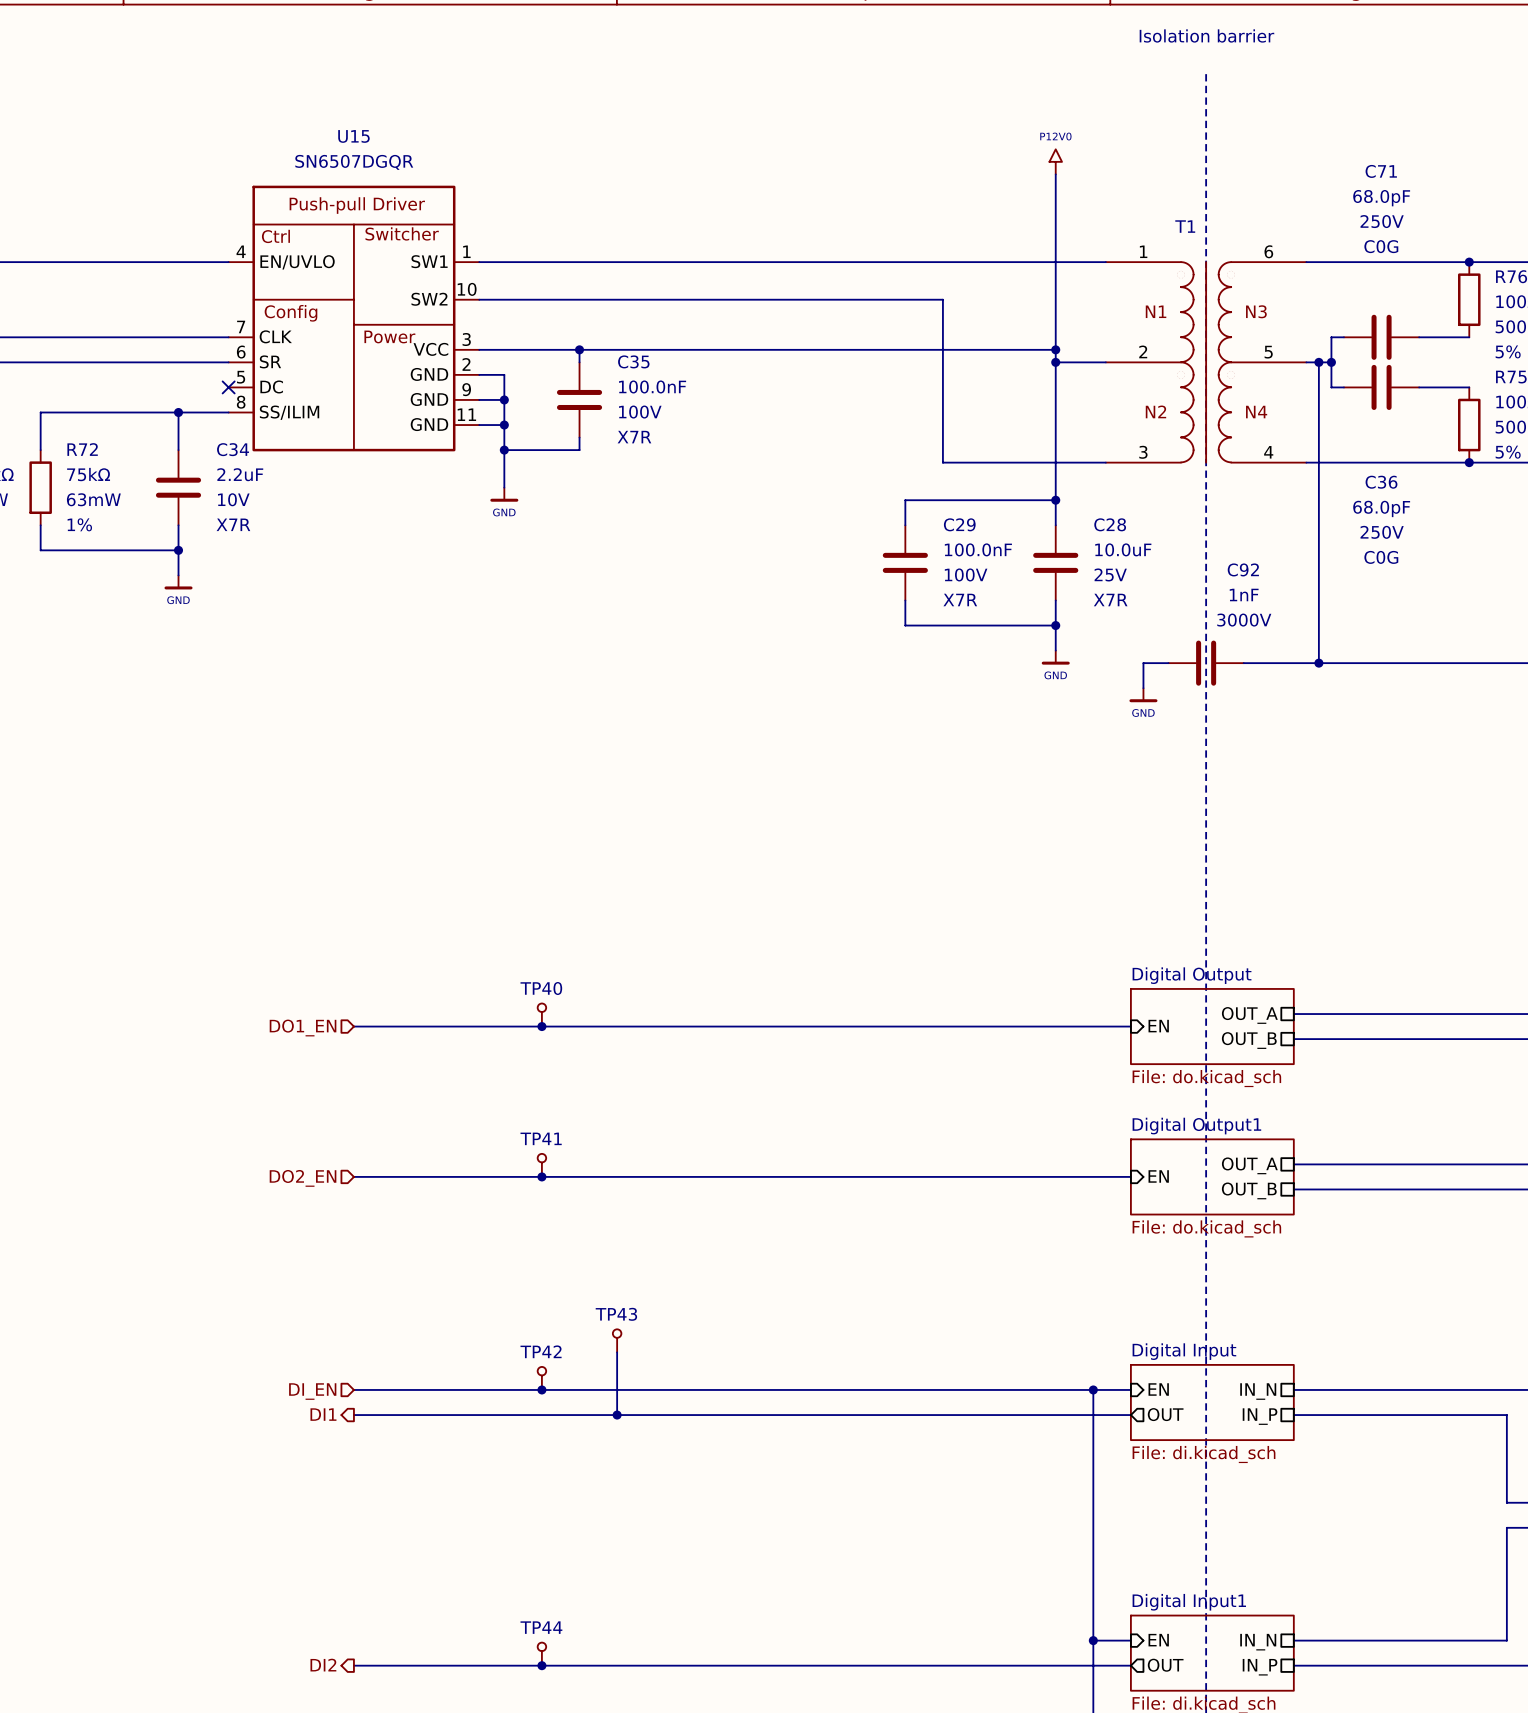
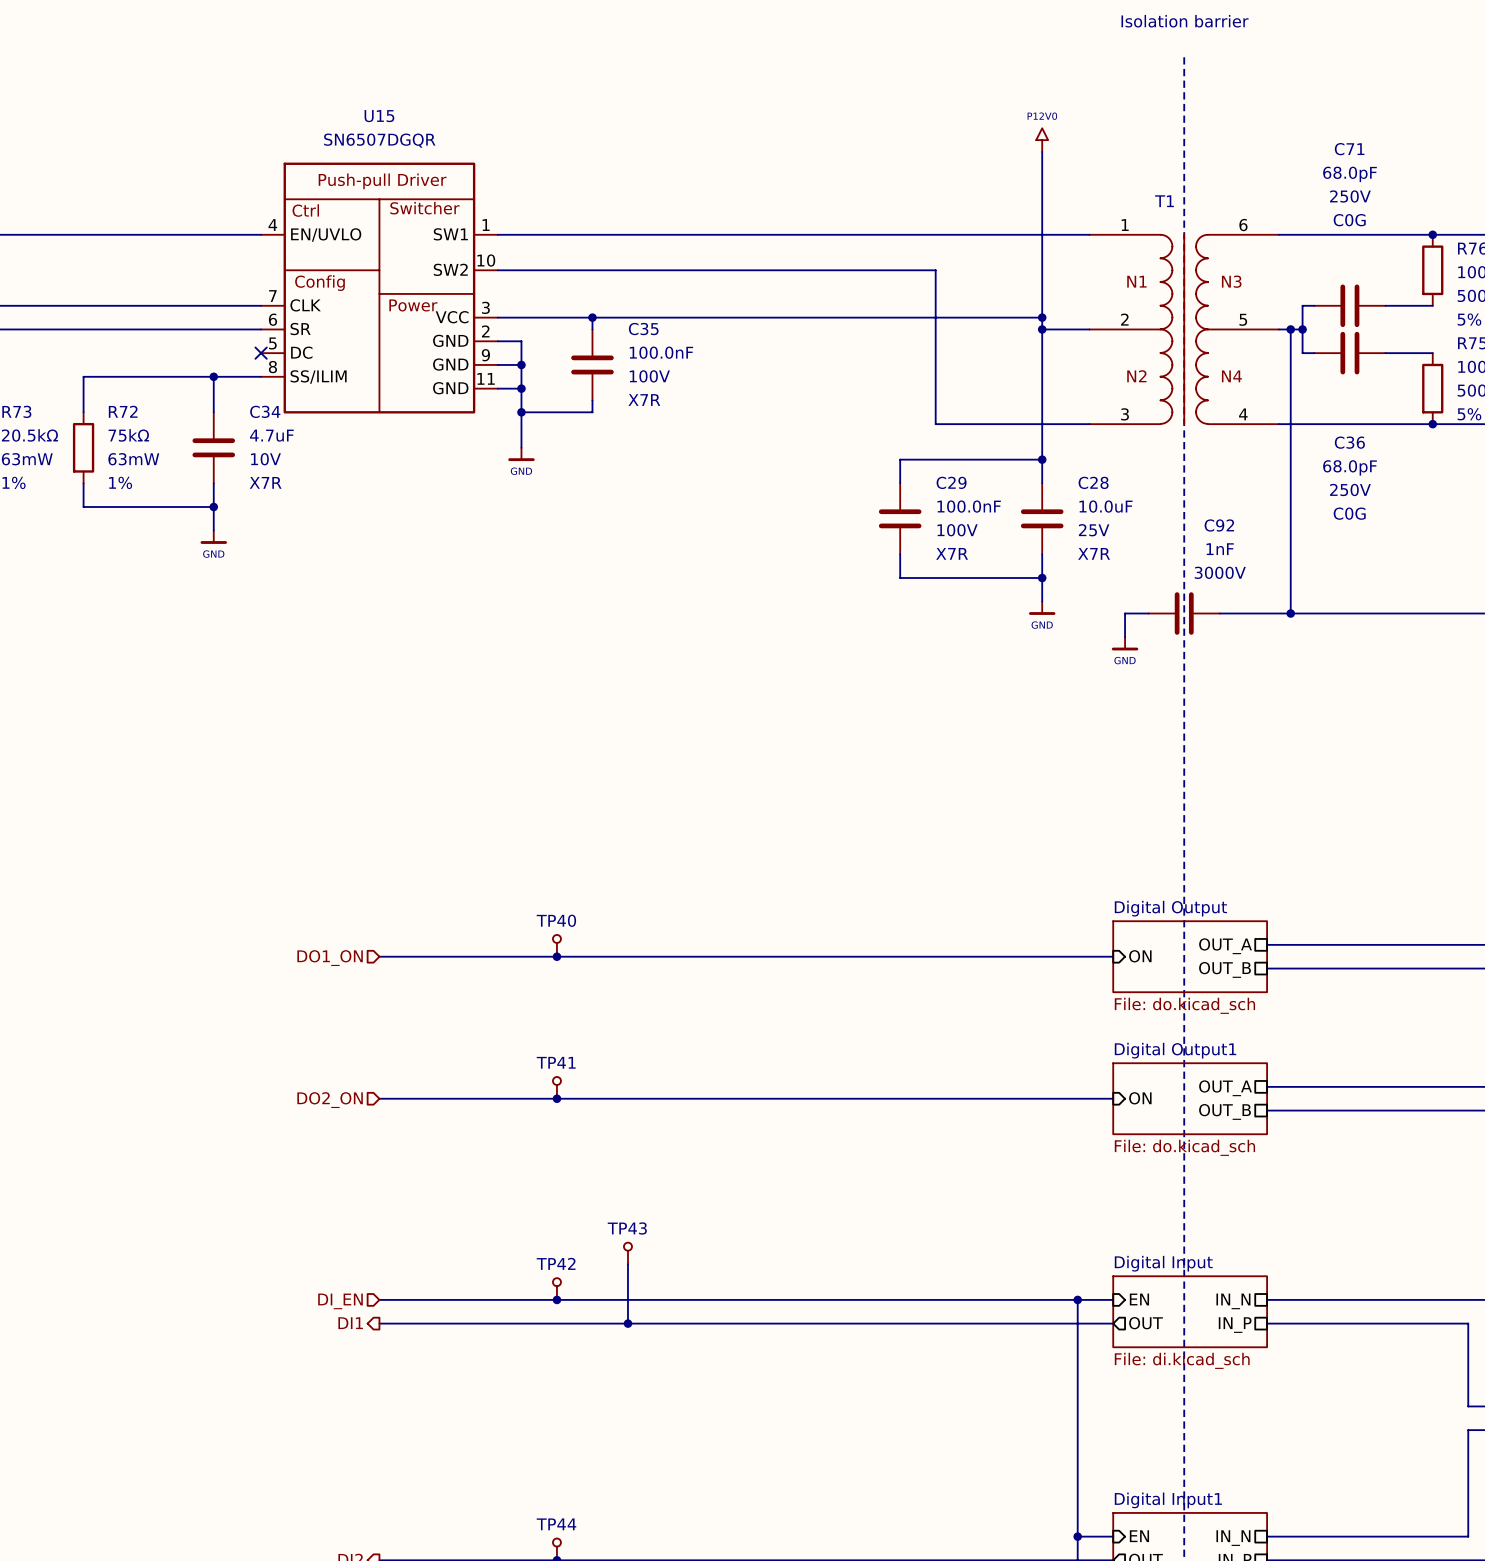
C34 value: 2.2uF (240, 474) -> 4.7uF (271, 435)
sheet pin: EN (1158, 1026) -> ON (1140, 956)
hierarchical label: DO1_EN (303, 1028) -> DO1_ON (330, 958)
sheet pin: EN (1158, 1176) -> ON (1140, 1098)
hierarchical label: DO2_EN (303, 1178) -> DO2_ON (330, 1100)

